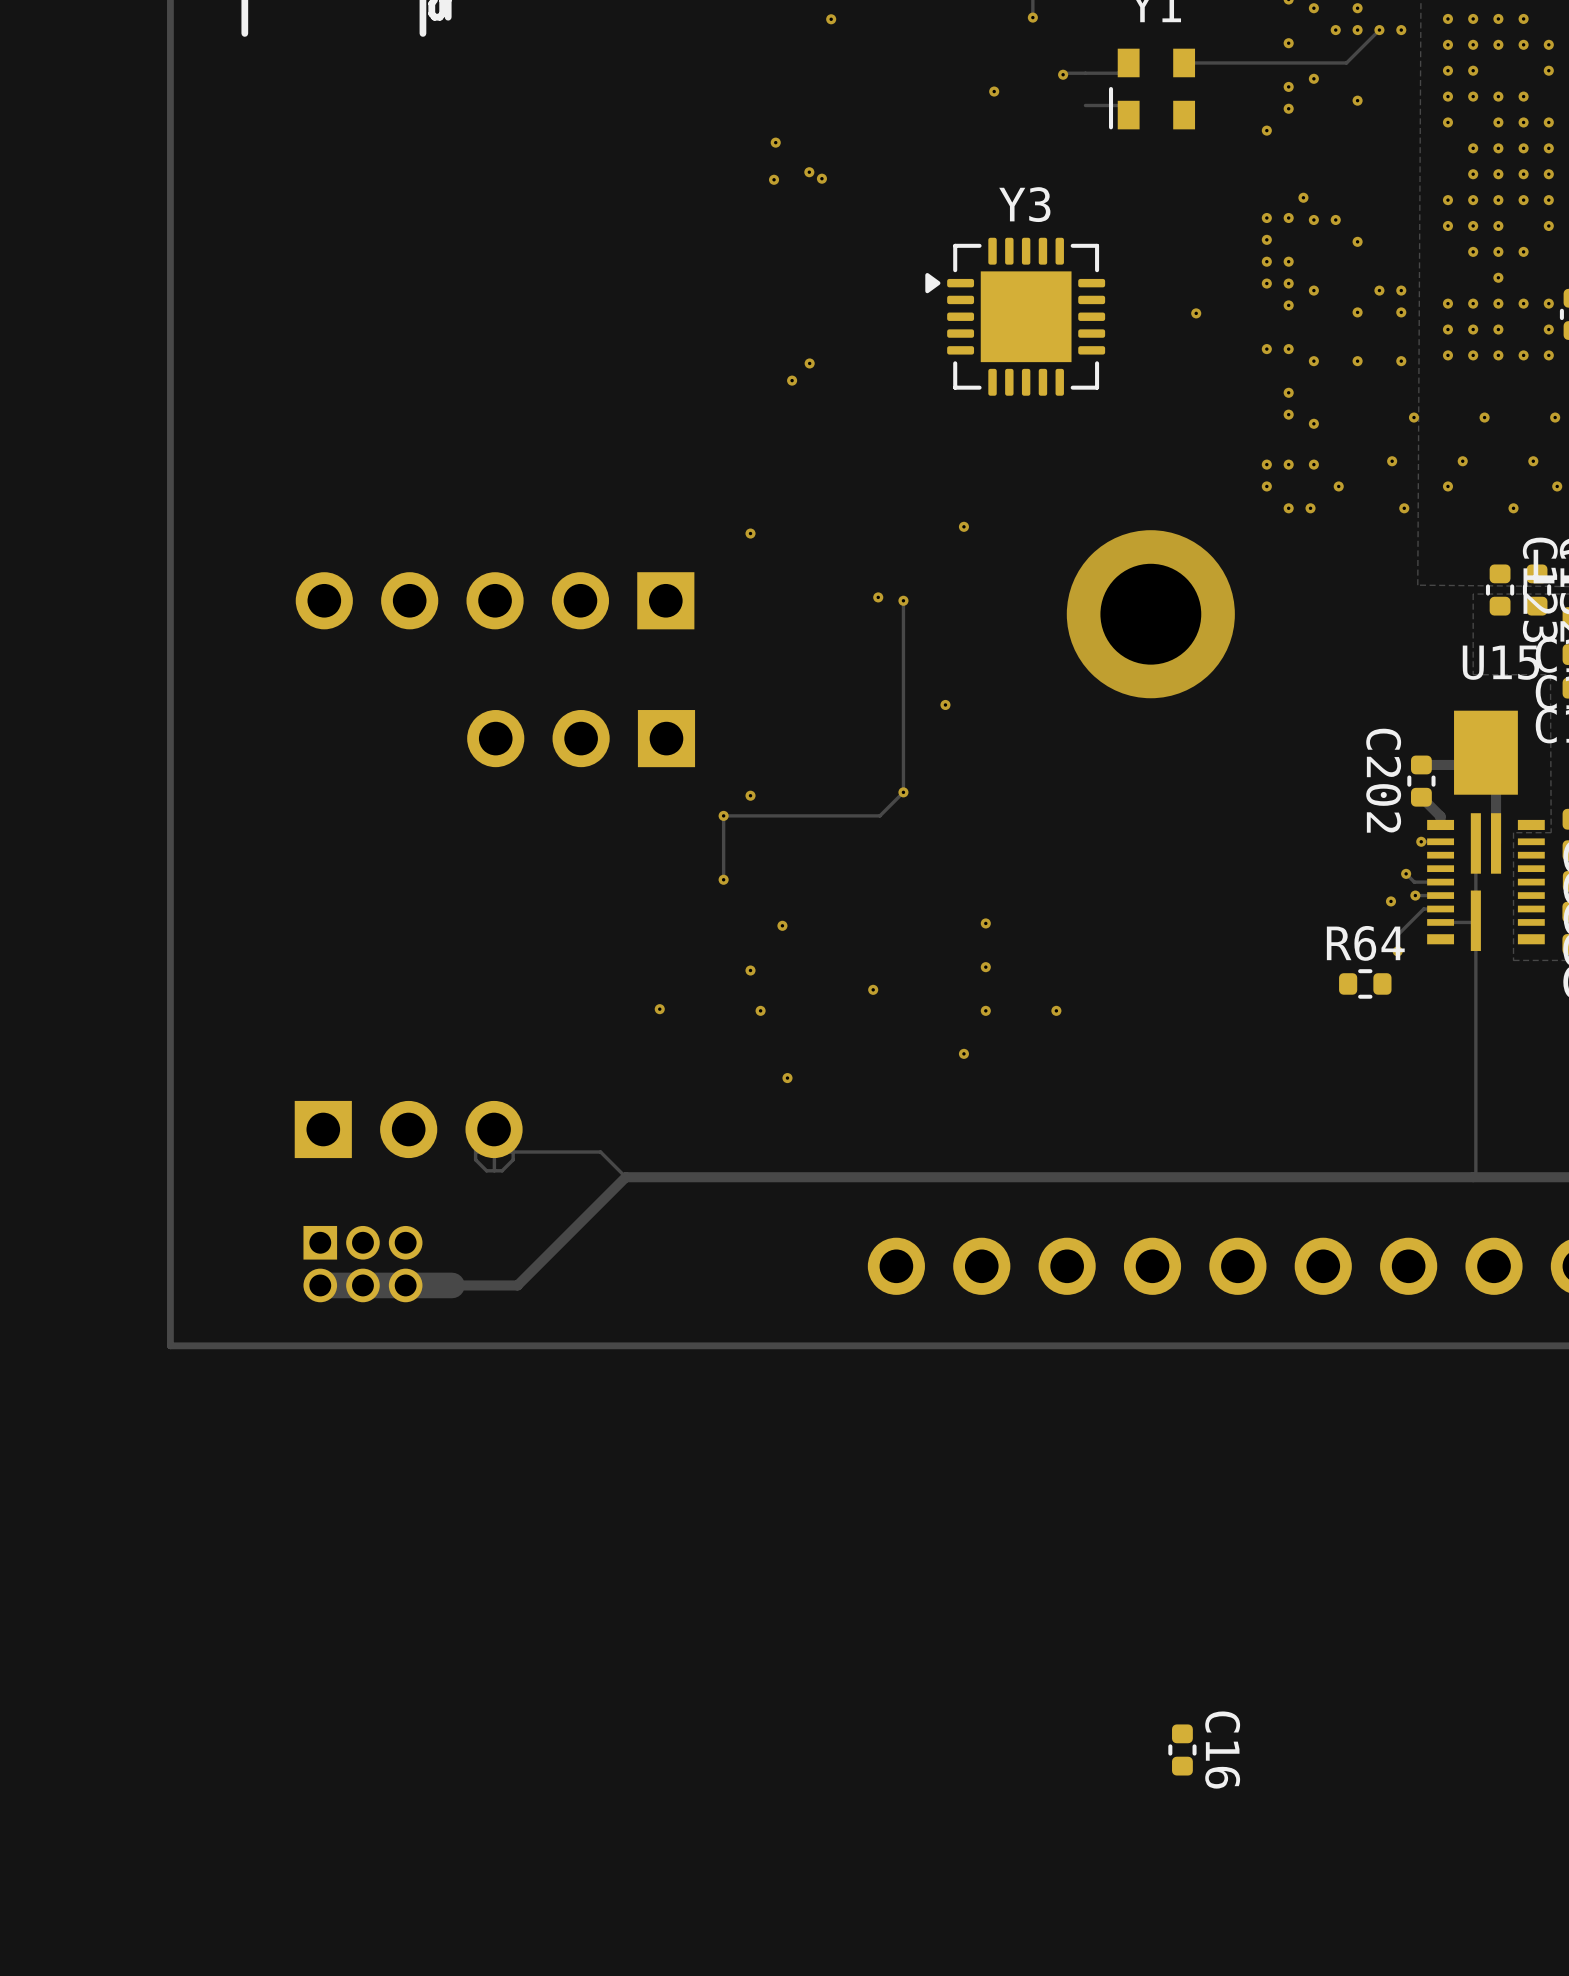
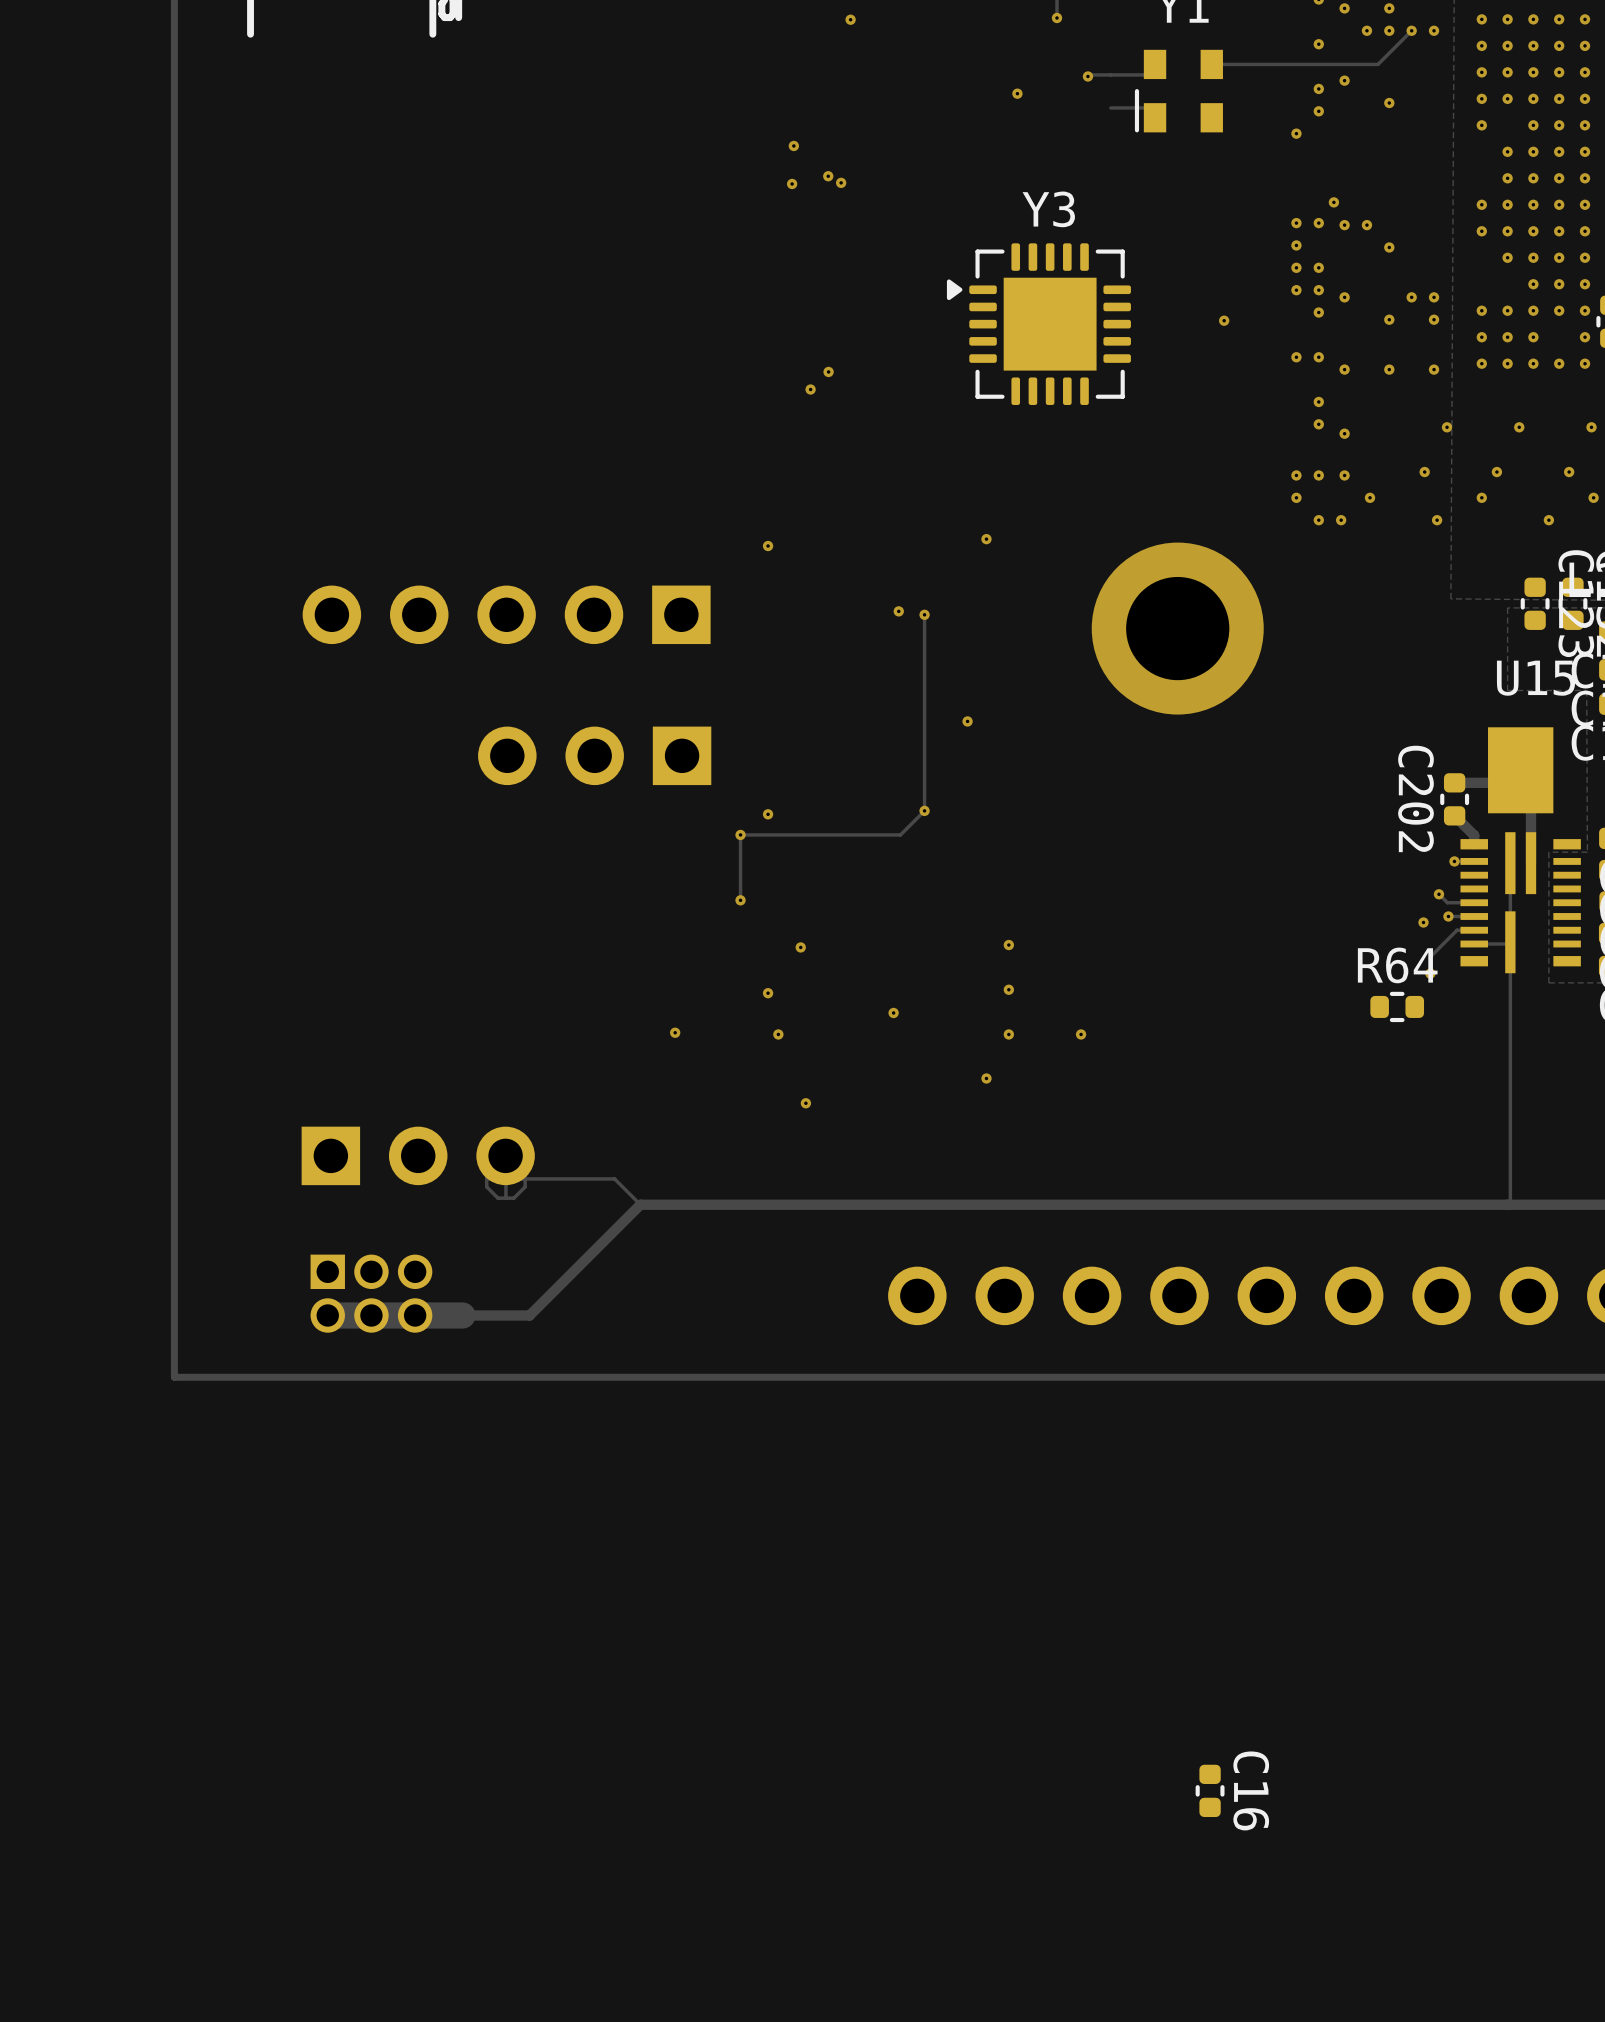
via: none -> (1585, 19)
via: none -> (1533, 72)
via: none -> (1559, 72)
via: none -> (1585, 98)
via: none -> (1559, 231)
via: none -> (1585, 257)
via: none -> (1559, 284)
via: none -> (1585, 284)

